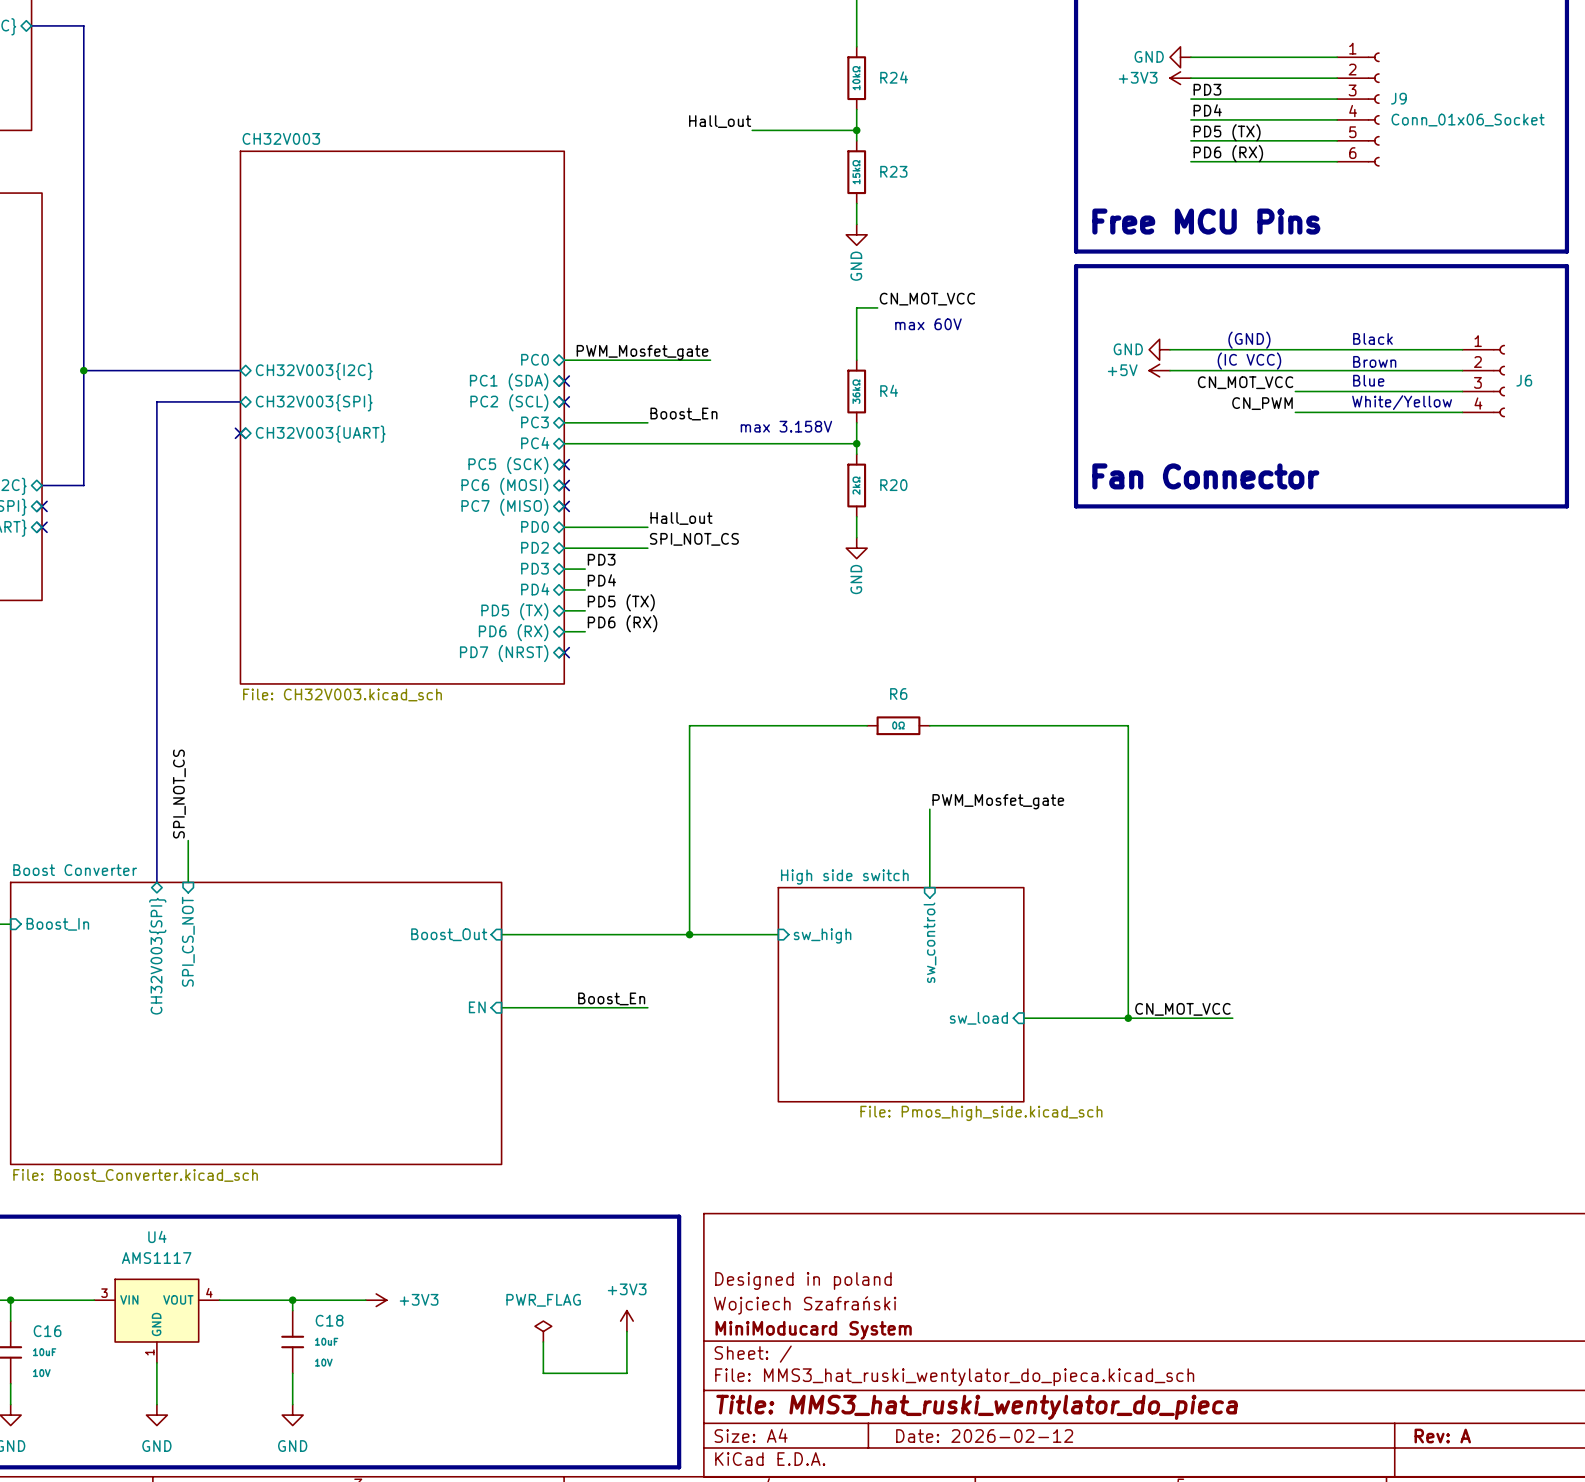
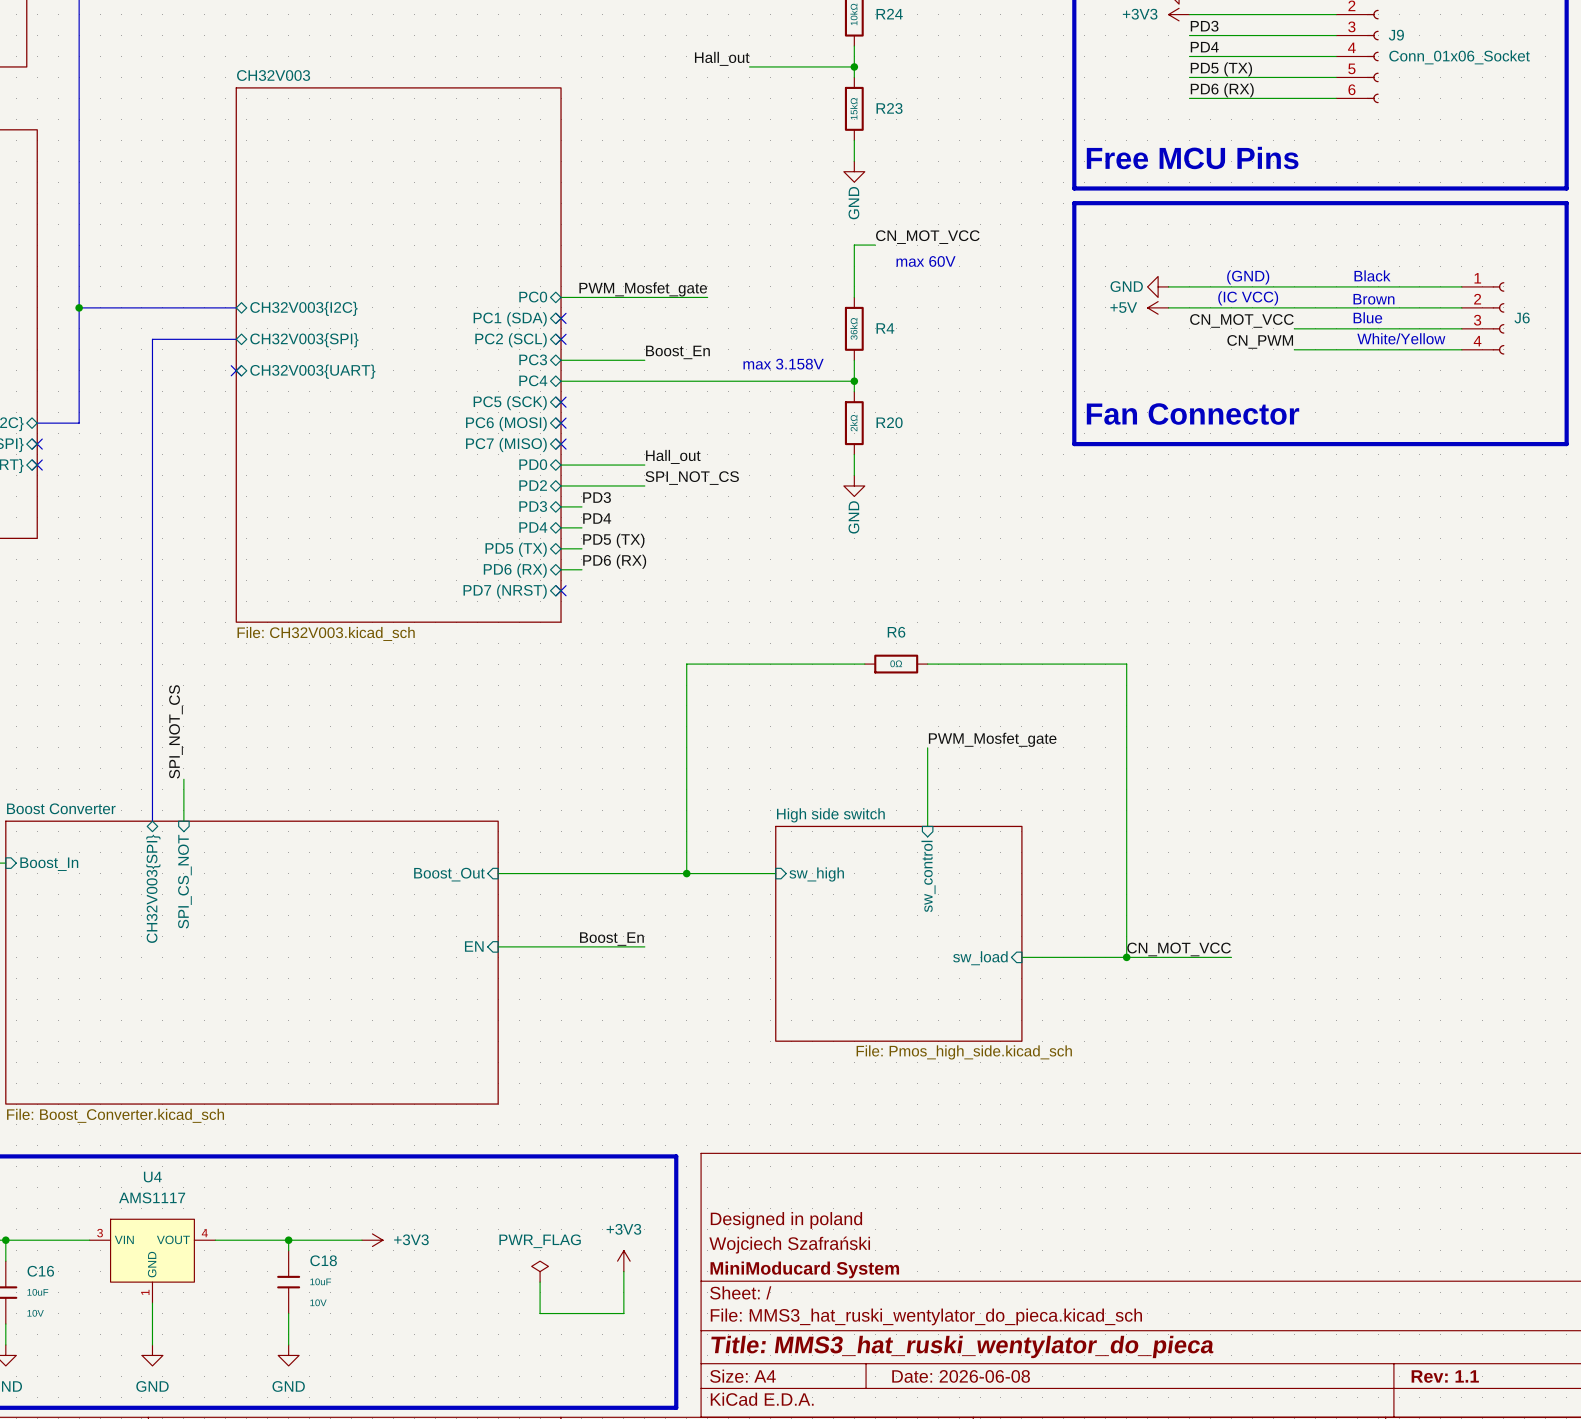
title block: Date: 2026-02-12 (984, 1436) -> Date: 2026-06-08 (961, 1376)
title block: Rev: A (1442, 1436) -> Rev: 1.1 (1445, 1376)

